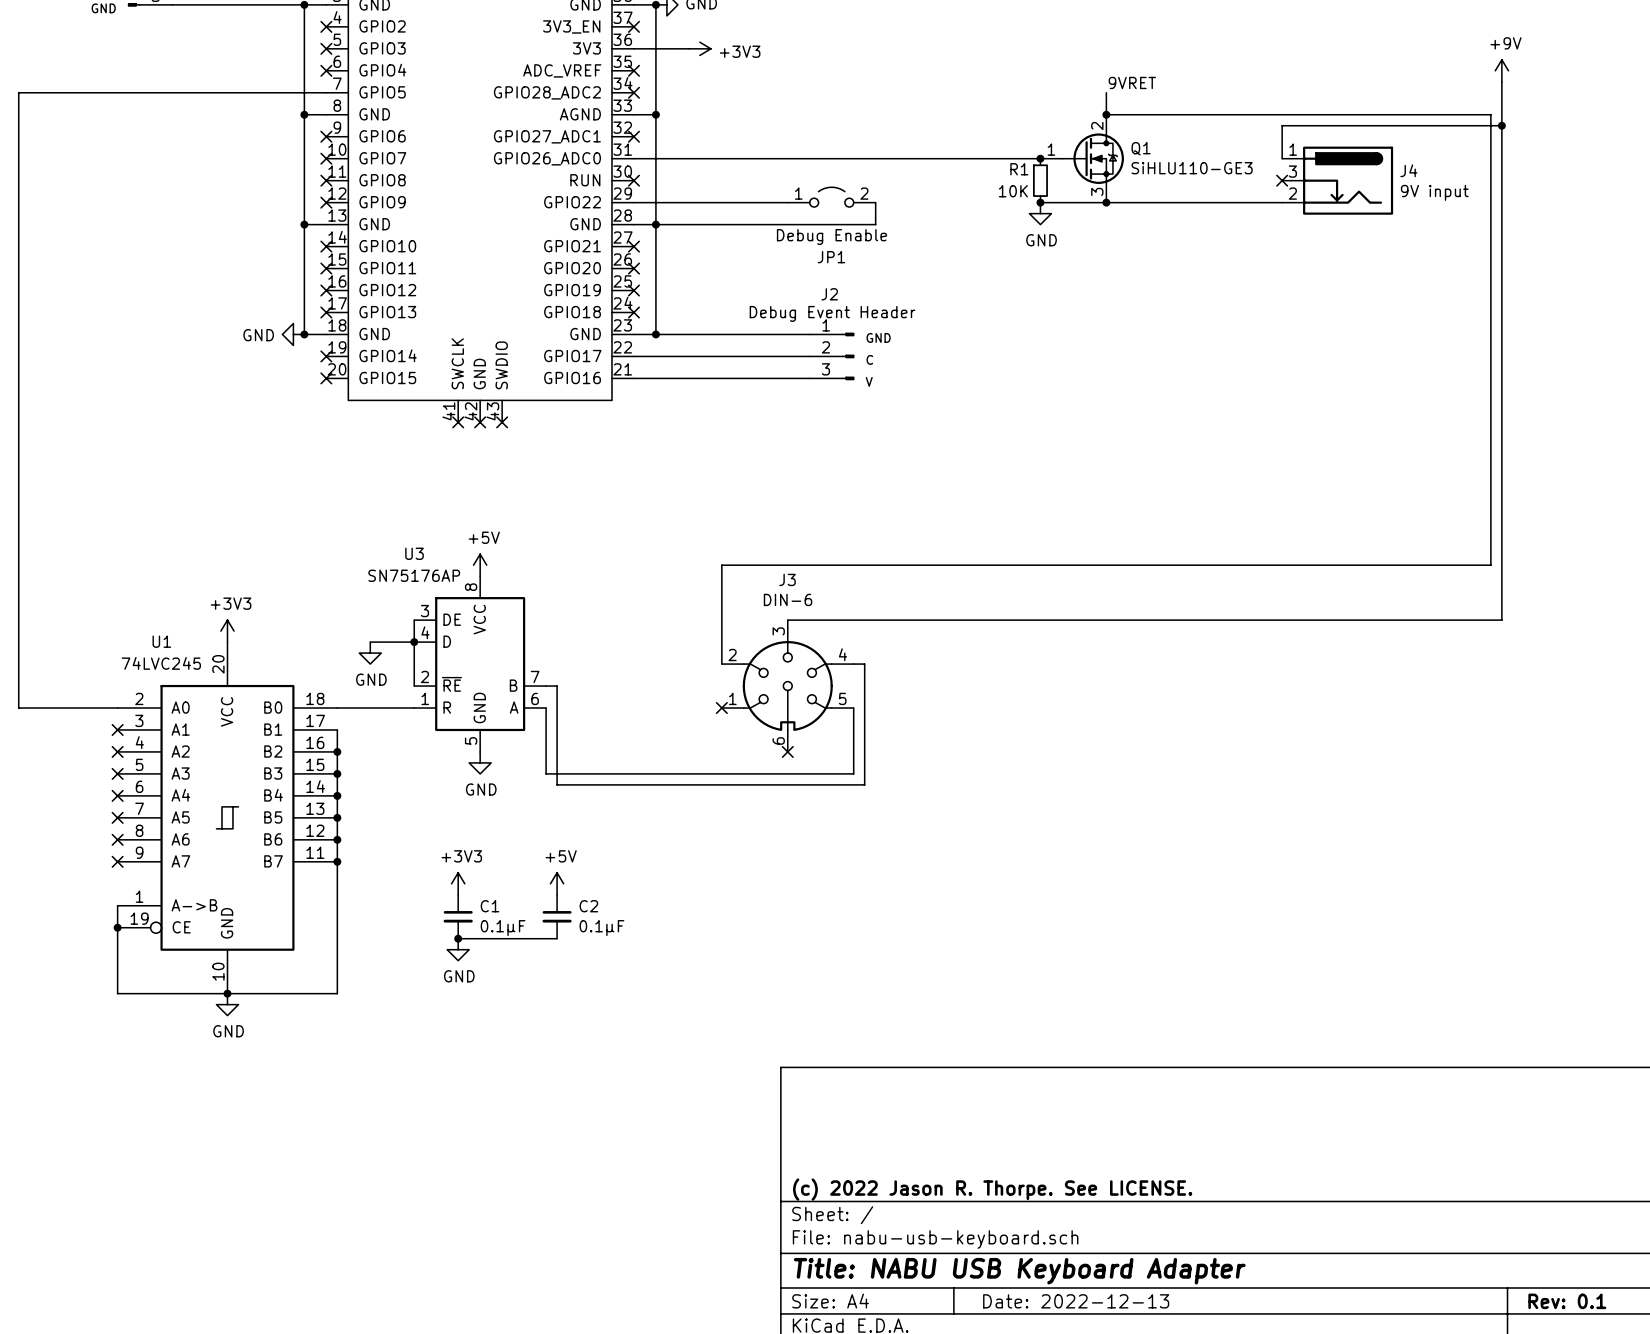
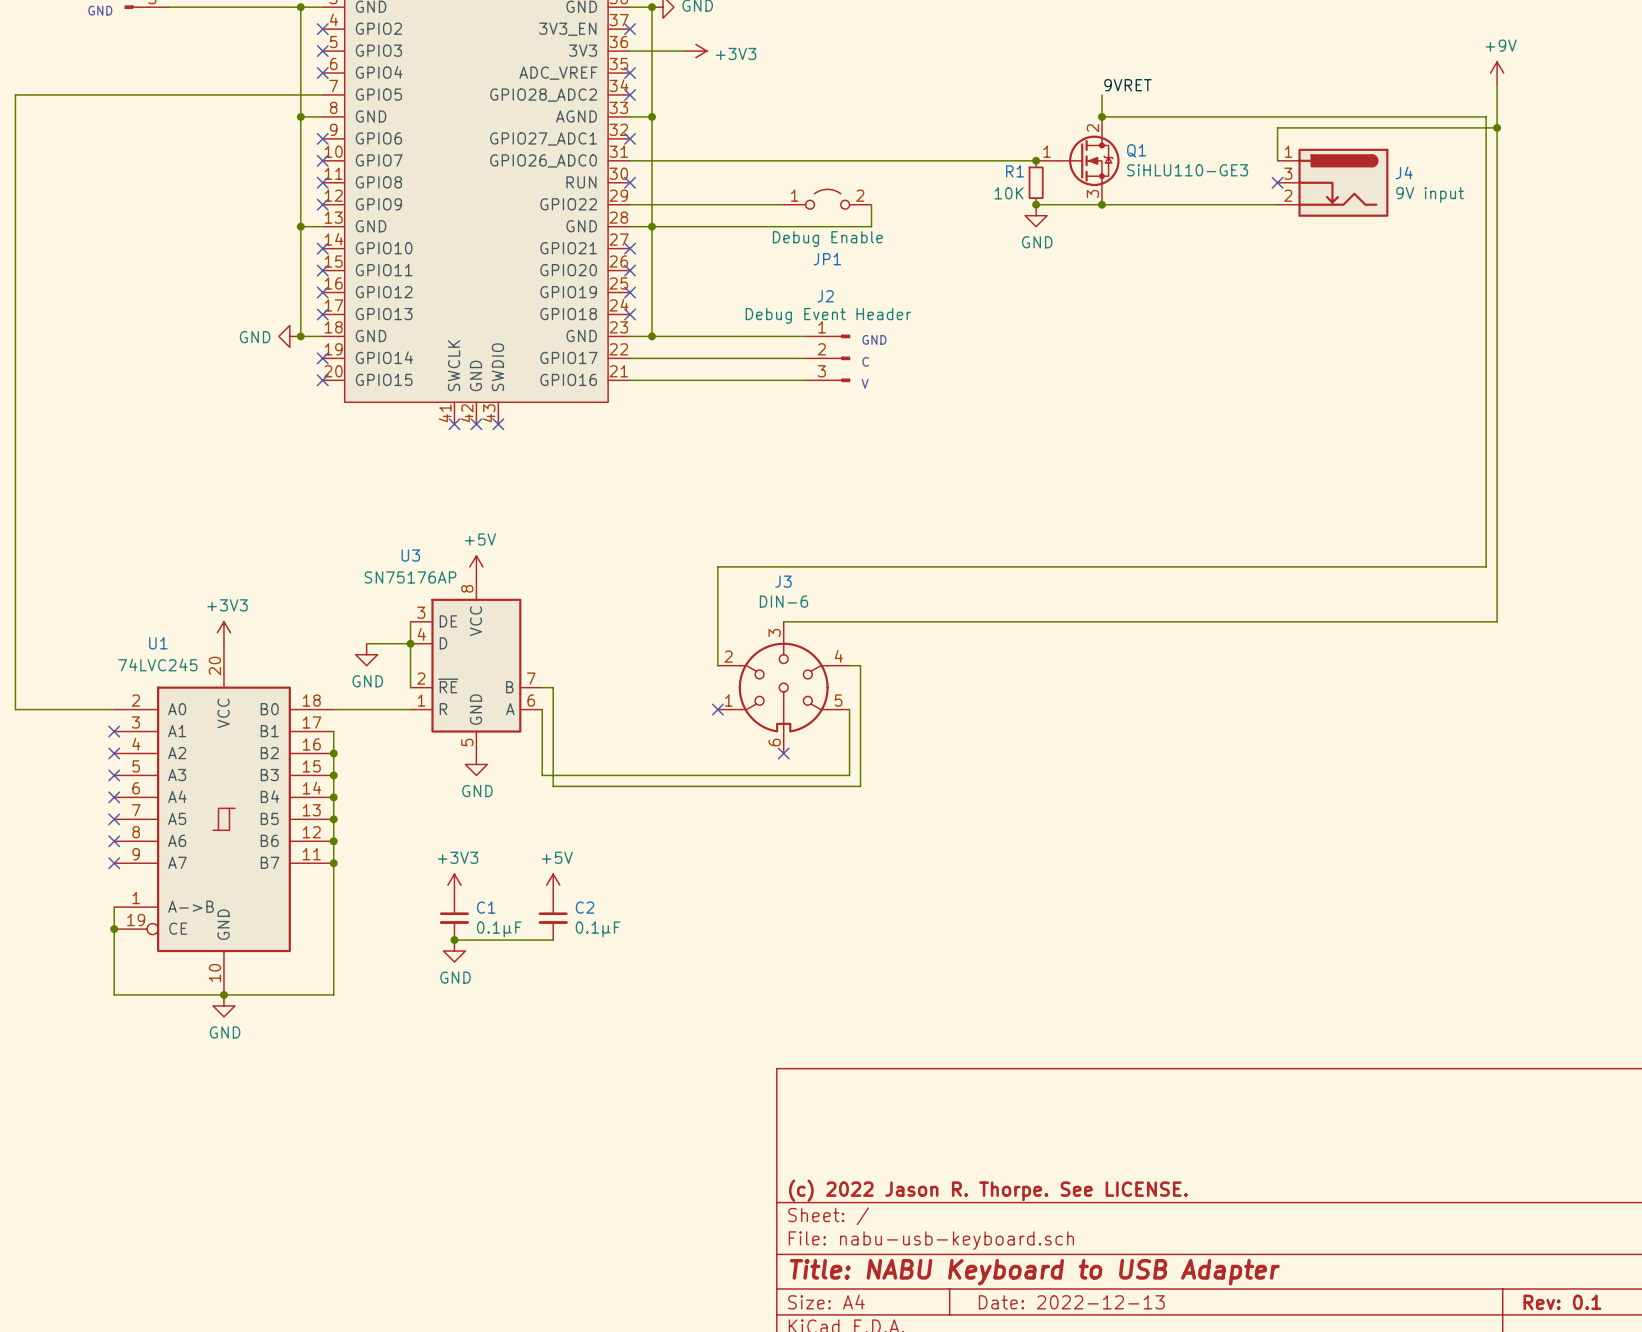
title block: Title: NABU USB Keyboard Adapter (1019, 1271) -> Title: NABU Keyboard to USB Adapter (1034, 1272)

